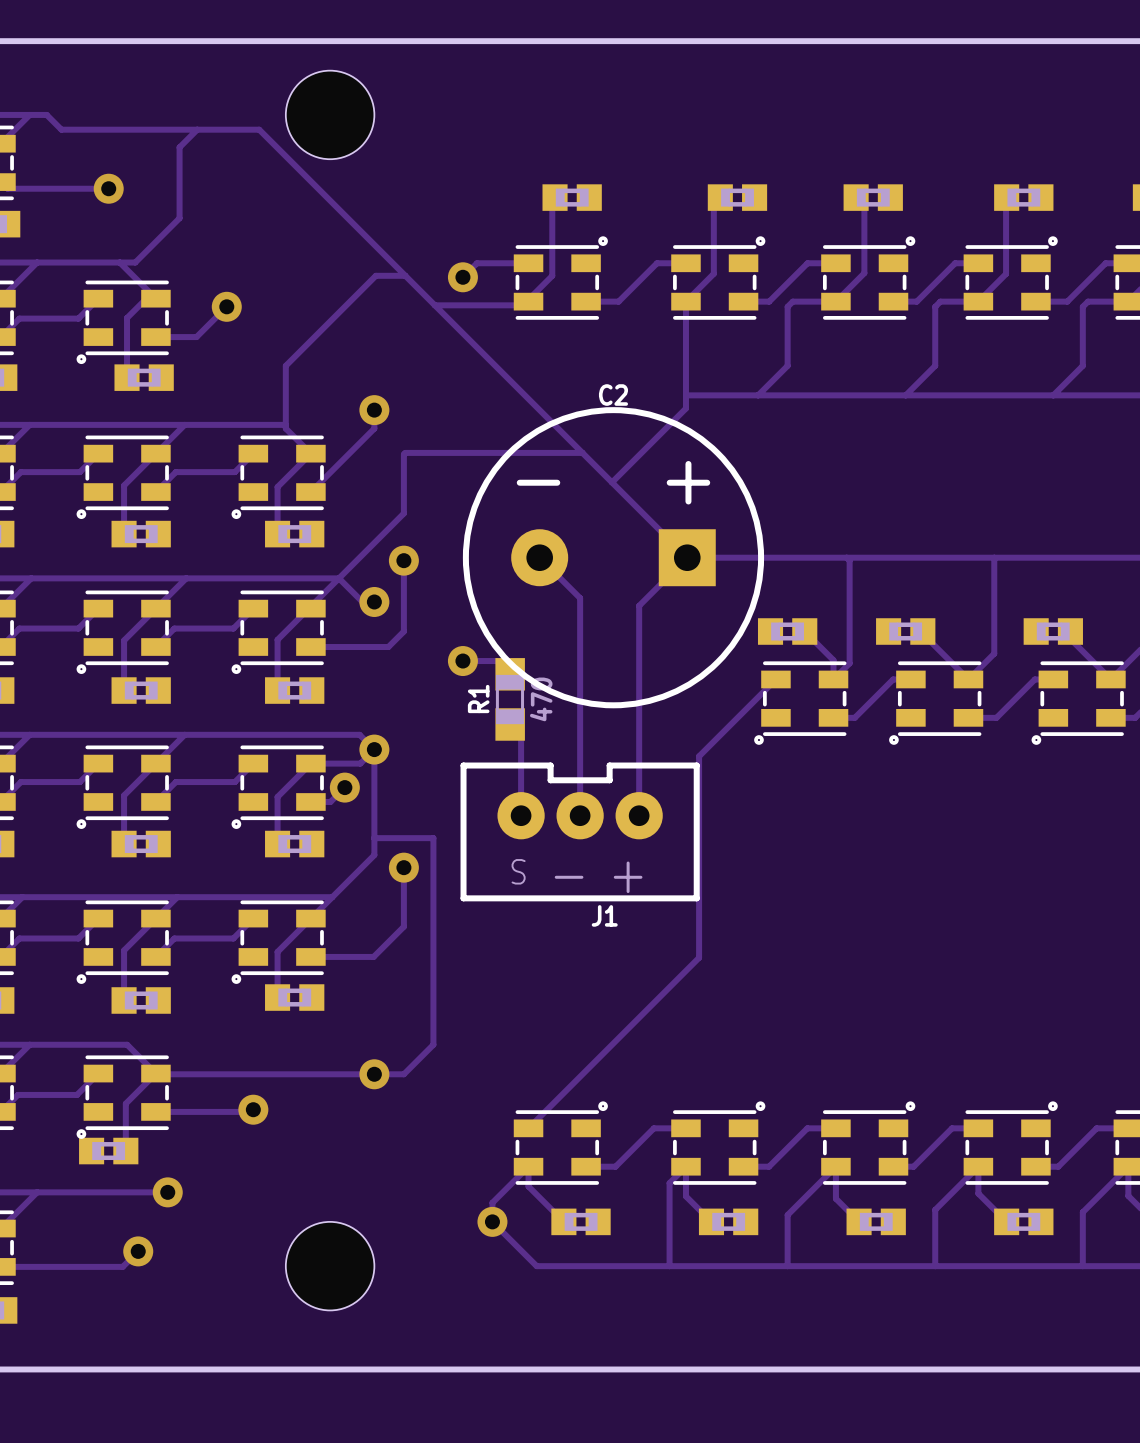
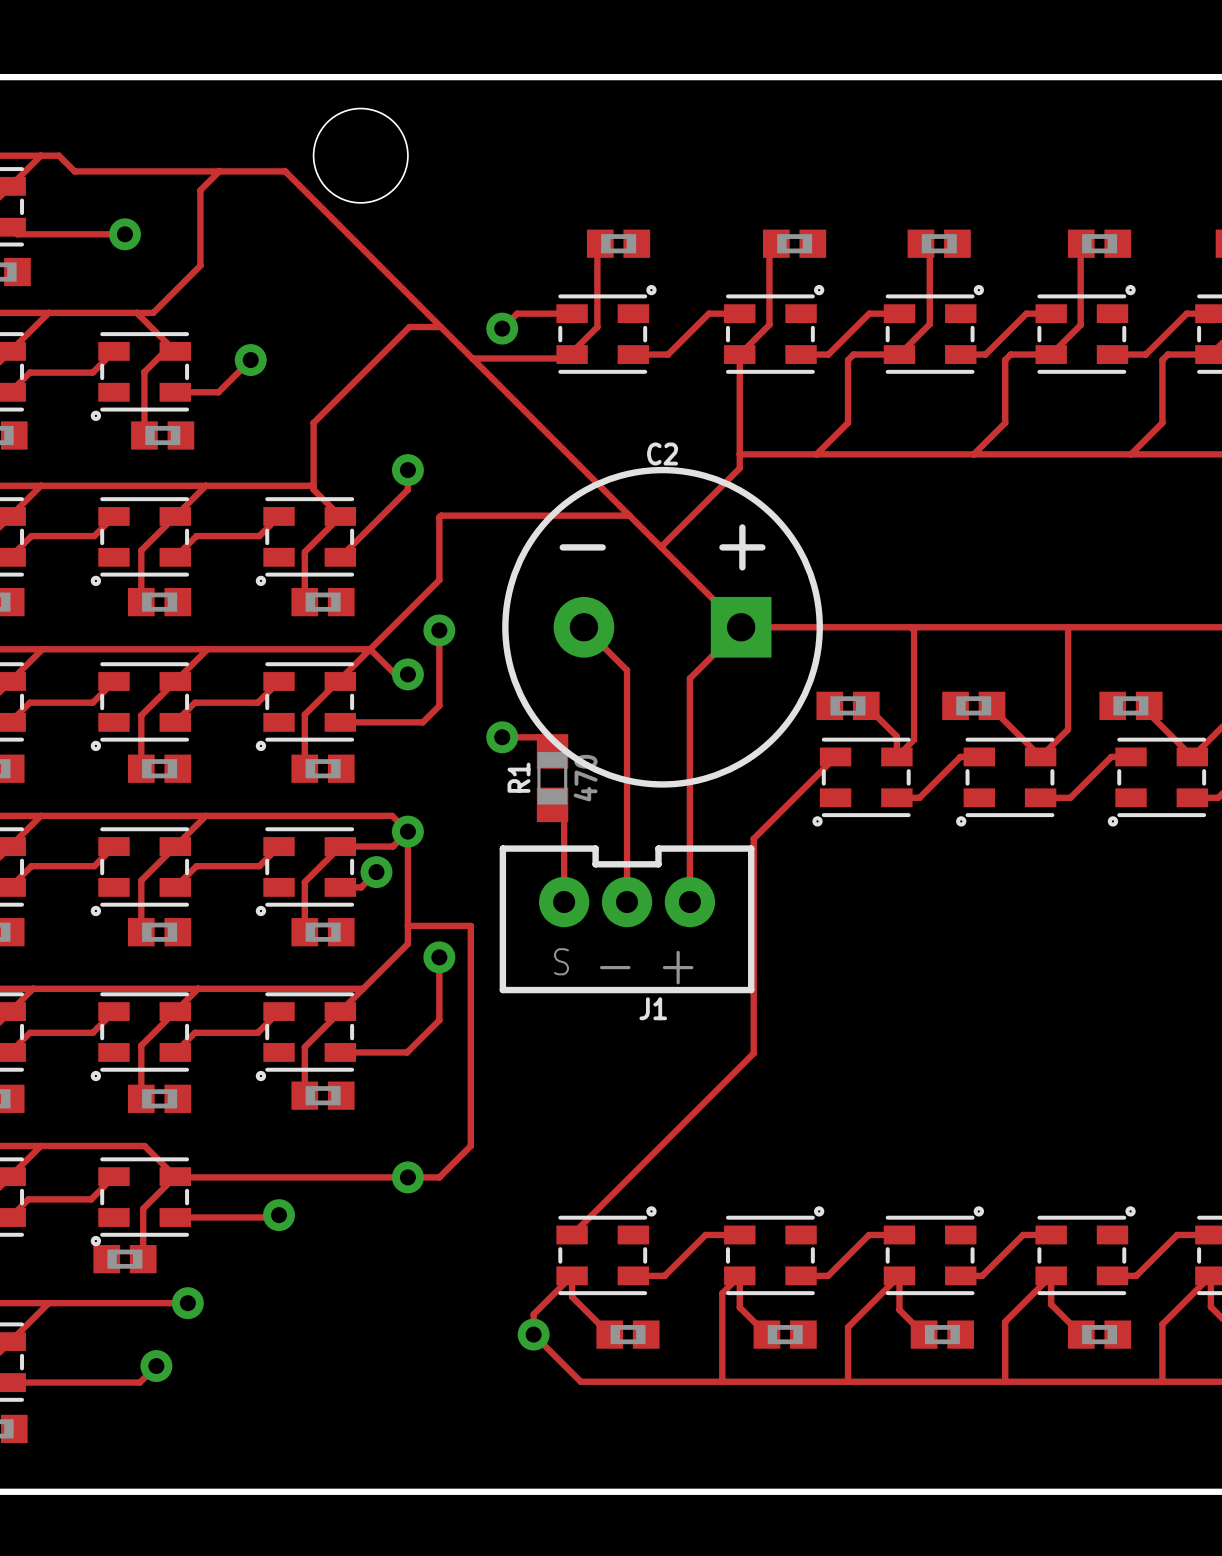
hole: (330, 1266) -> none

